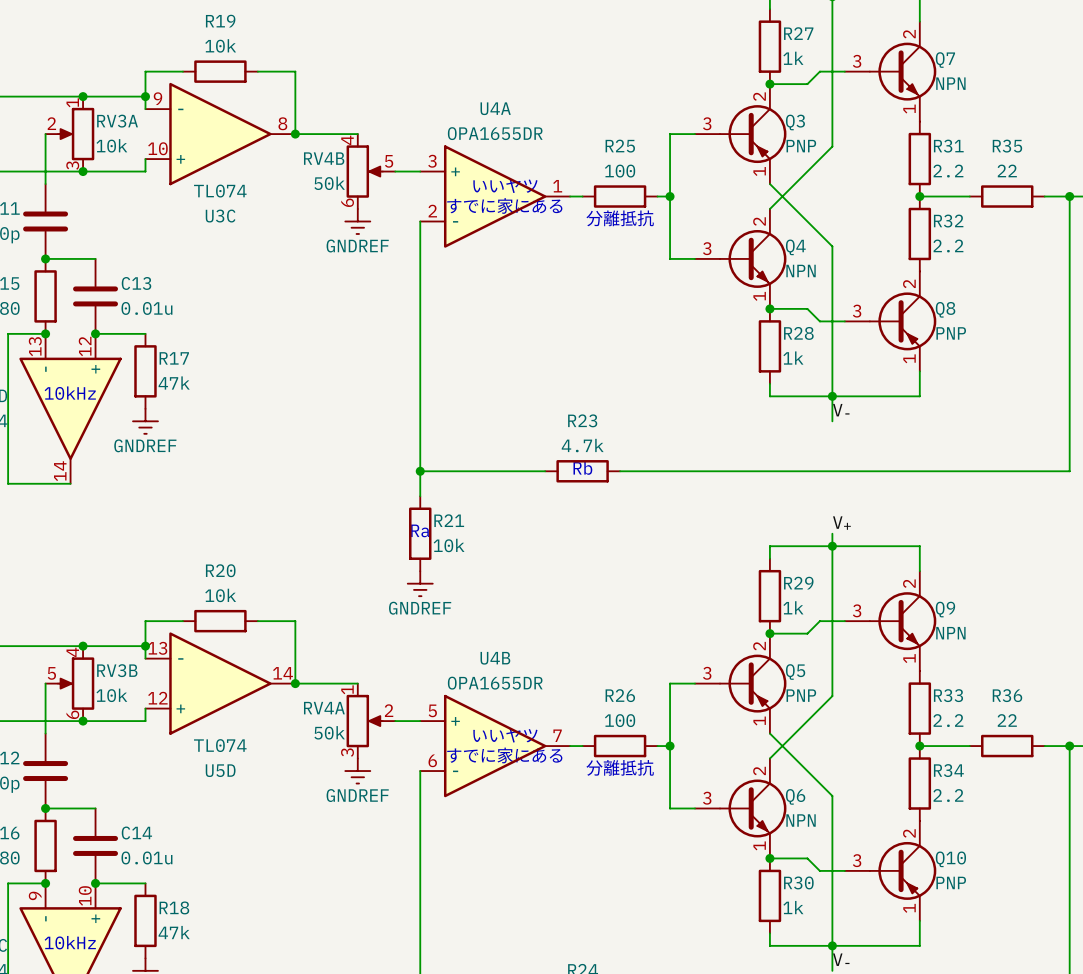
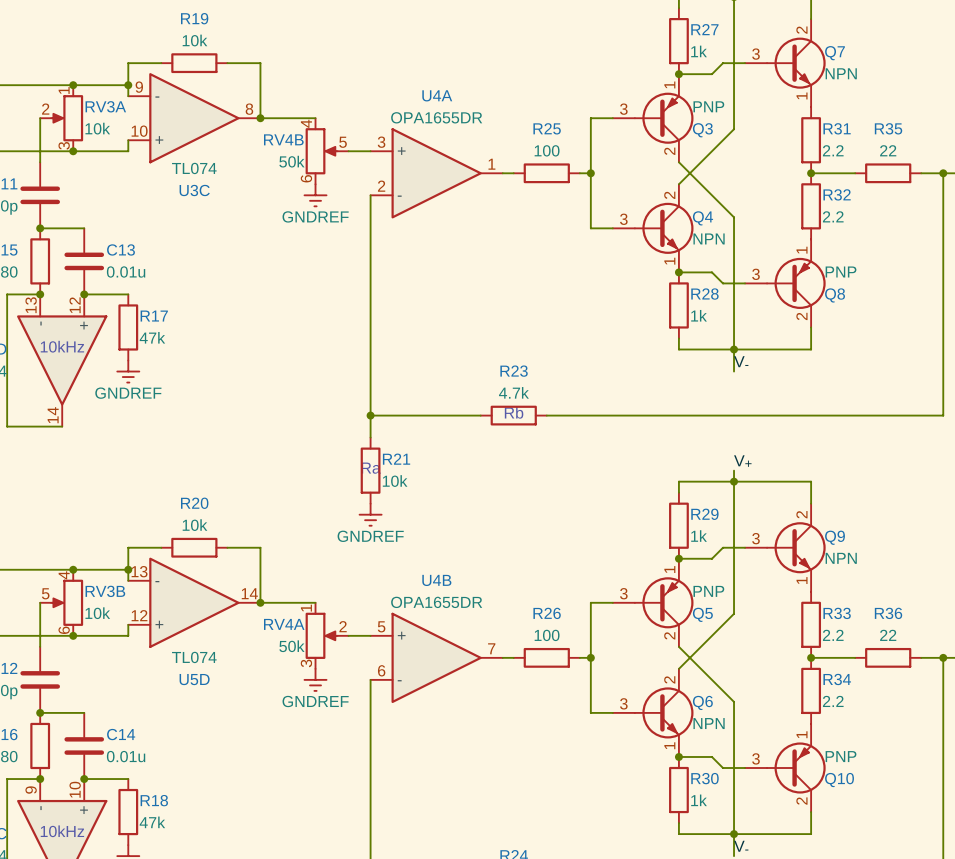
Q3 flip: as is (753, 134) -> up-down (664, 118)
text: いいヤツ (505, 185) -> none
text: すでに家にある (504, 205) -> none
text: 分離抵抗 (620, 218) -> none
Q8 flip: as is (903, 321) -> up-down (796, 283)
Q5 flip: as is (753, 683) -> up-down (664, 602)
text: いいヤツ (505, 735) -> none
text: すでに家にある (504, 755) -> none
text: 分離抵抗 (620, 767) -> none
Q10 flip: as is (903, 870) -> up-down (796, 768)

